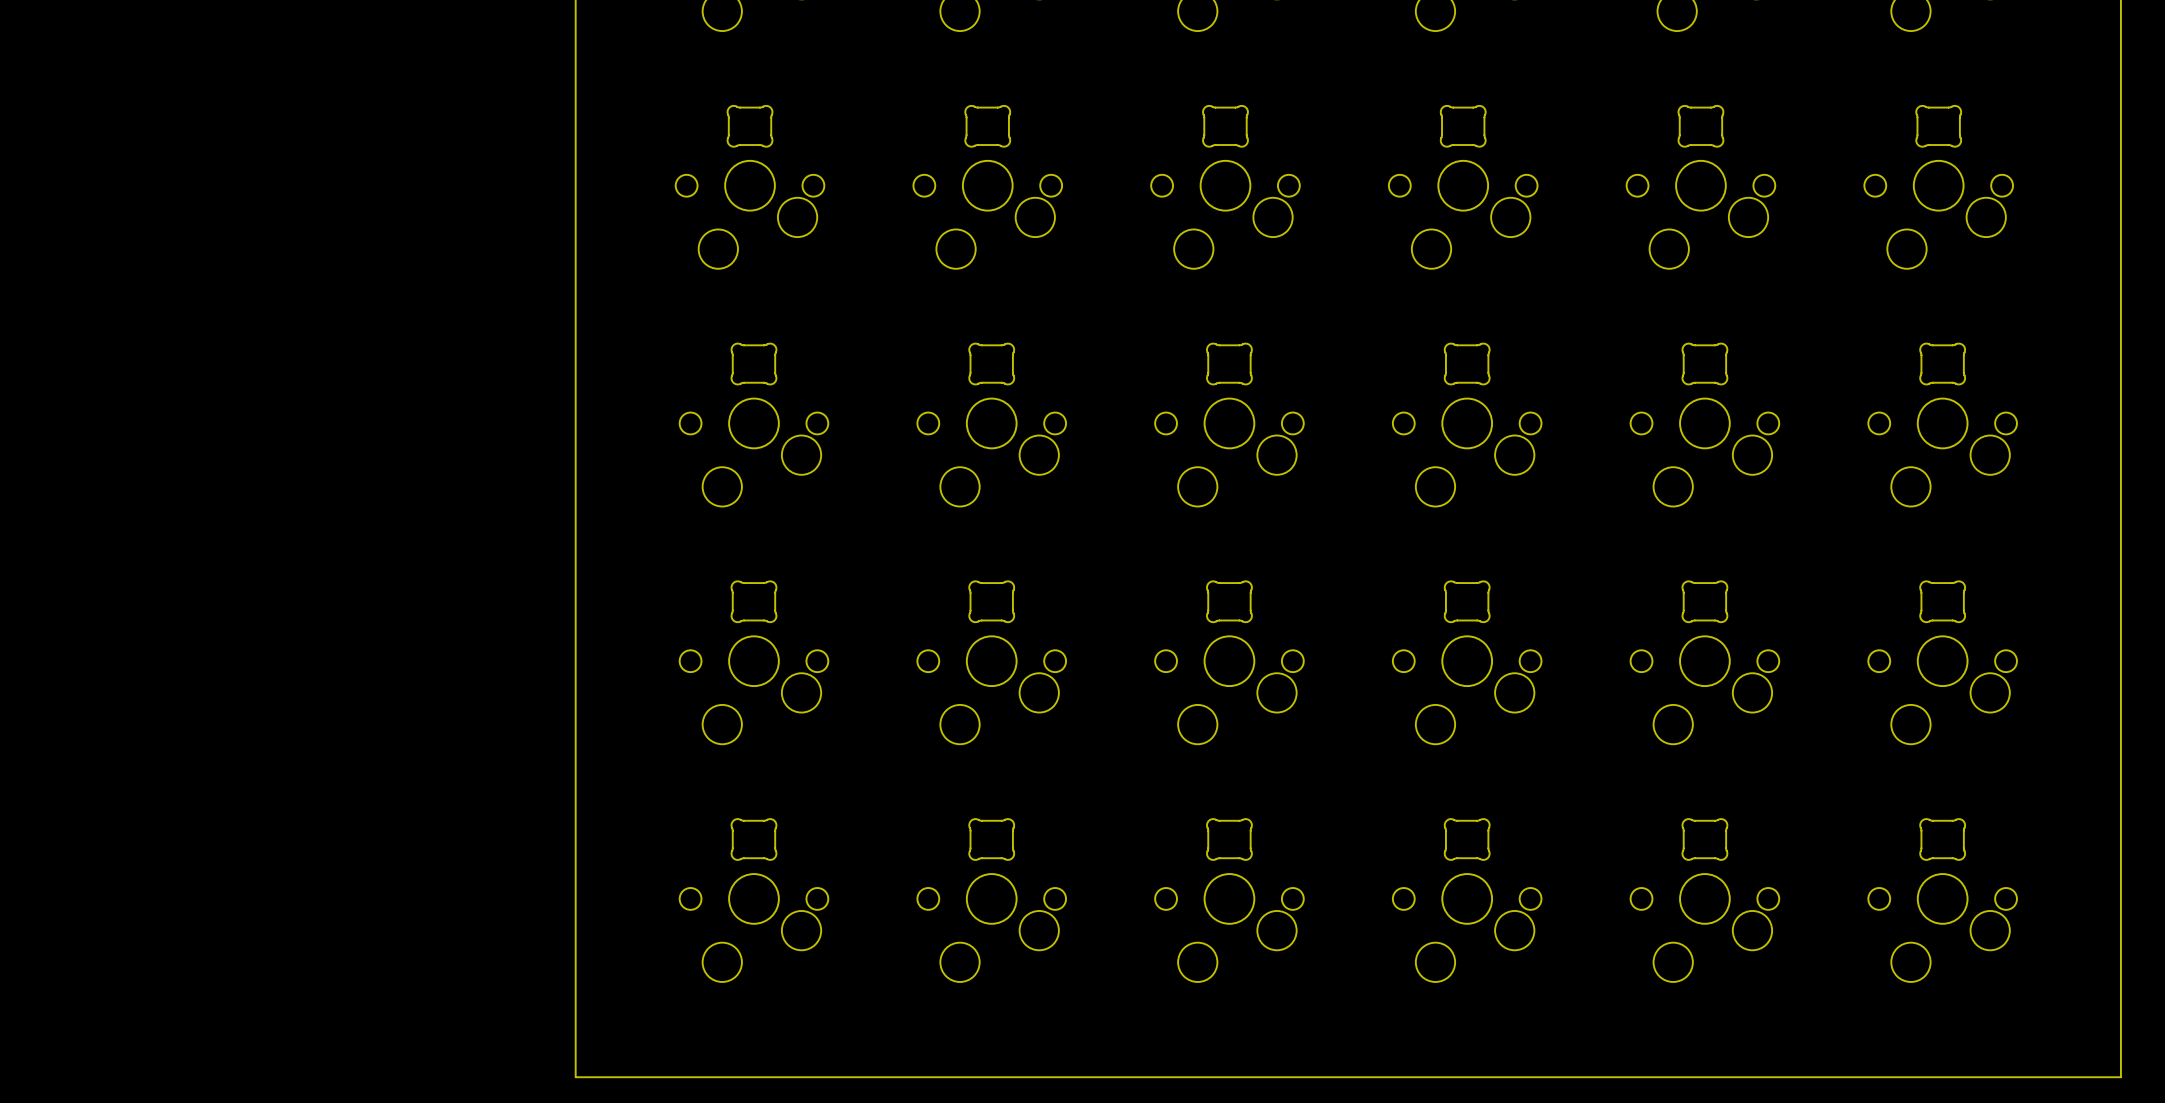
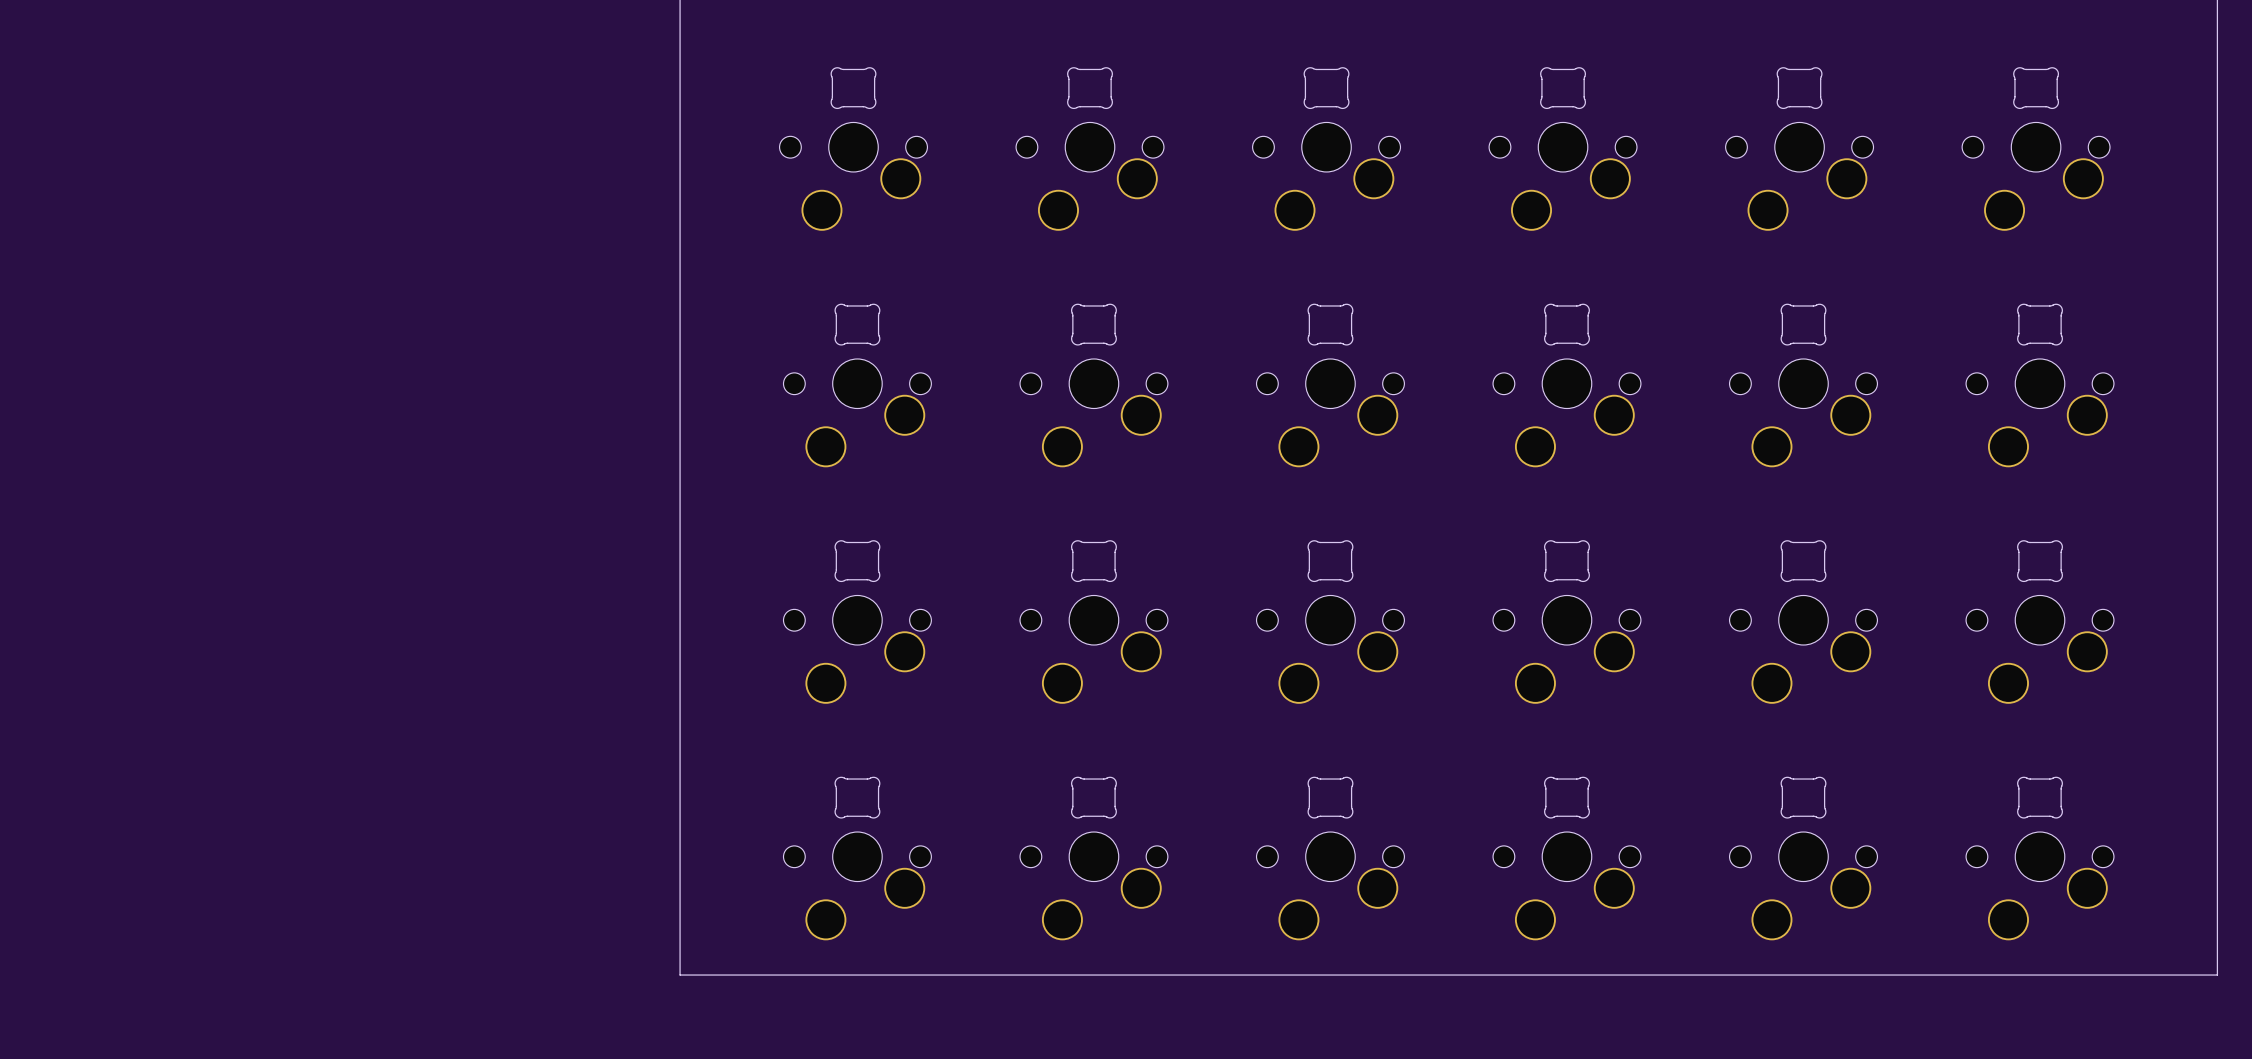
board edge: (2120, 1017) (2120, 1077) (575, 1077) (575, 1017) -> (2217, 975) (680, 975)

